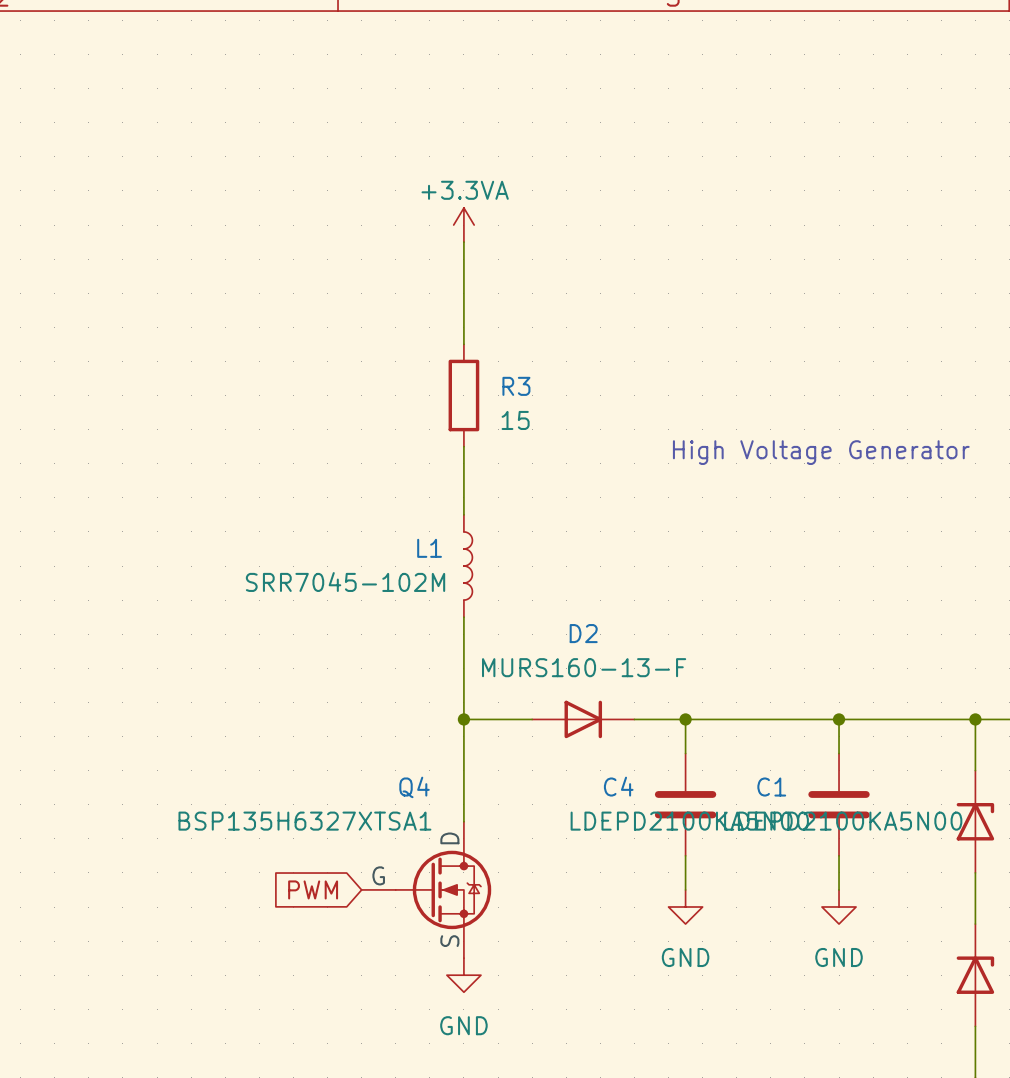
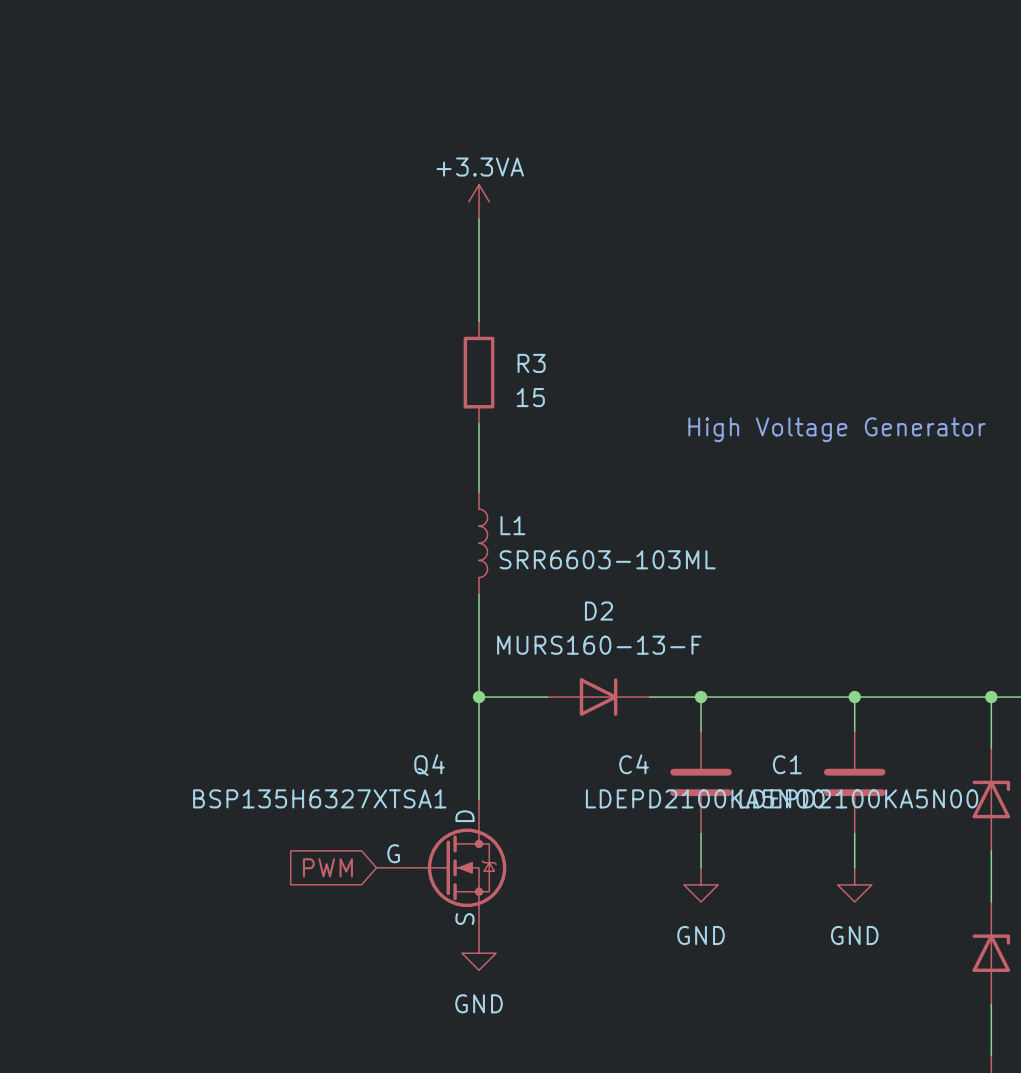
L1 name position: L1 (429, 548) -> L1 (512, 525)
L1 value: SRR7045-102M (345, 582) -> SRR6603-103ML (607, 559)

